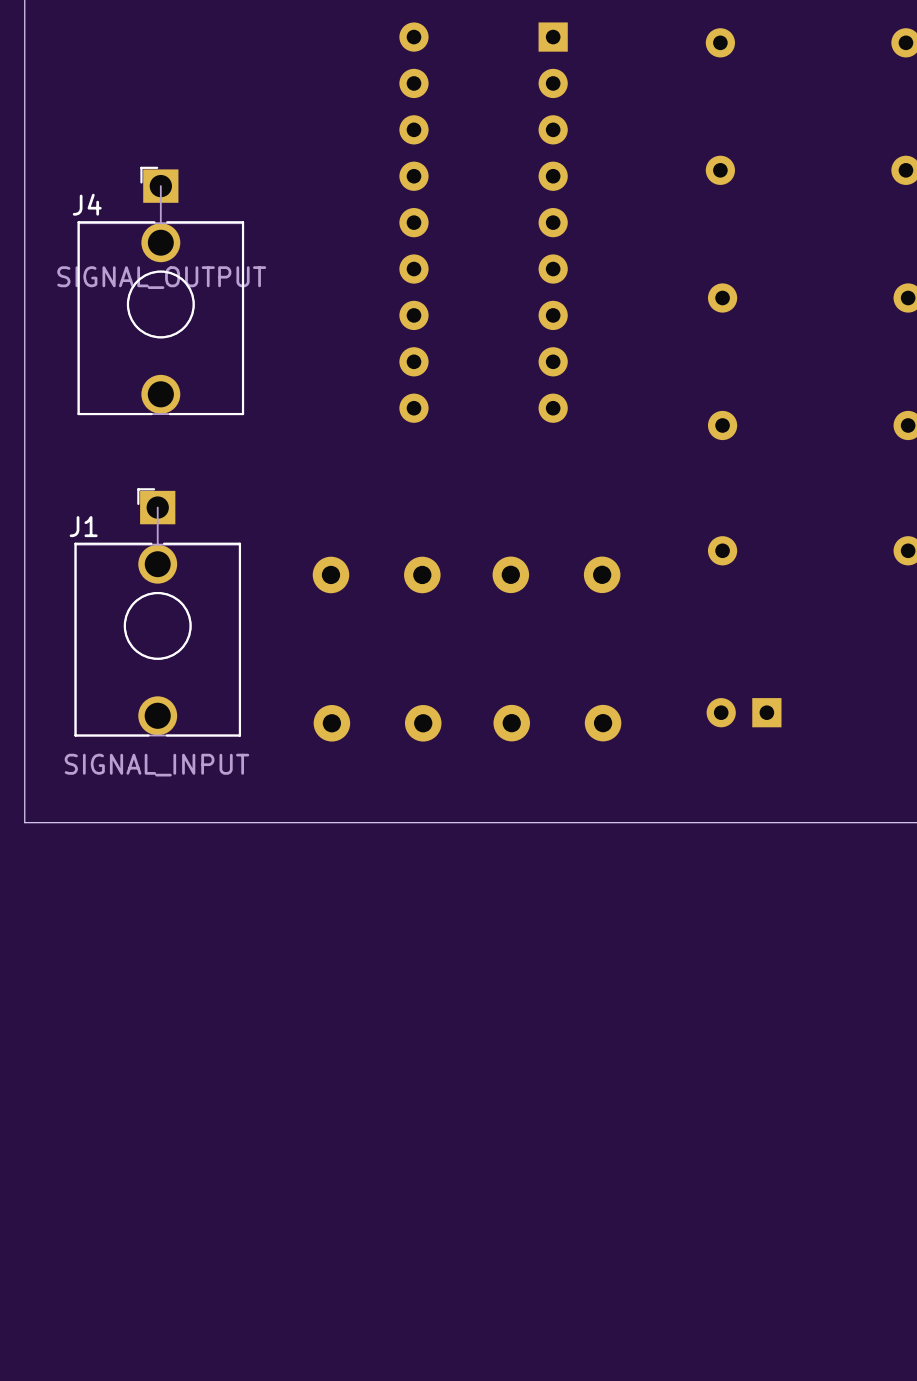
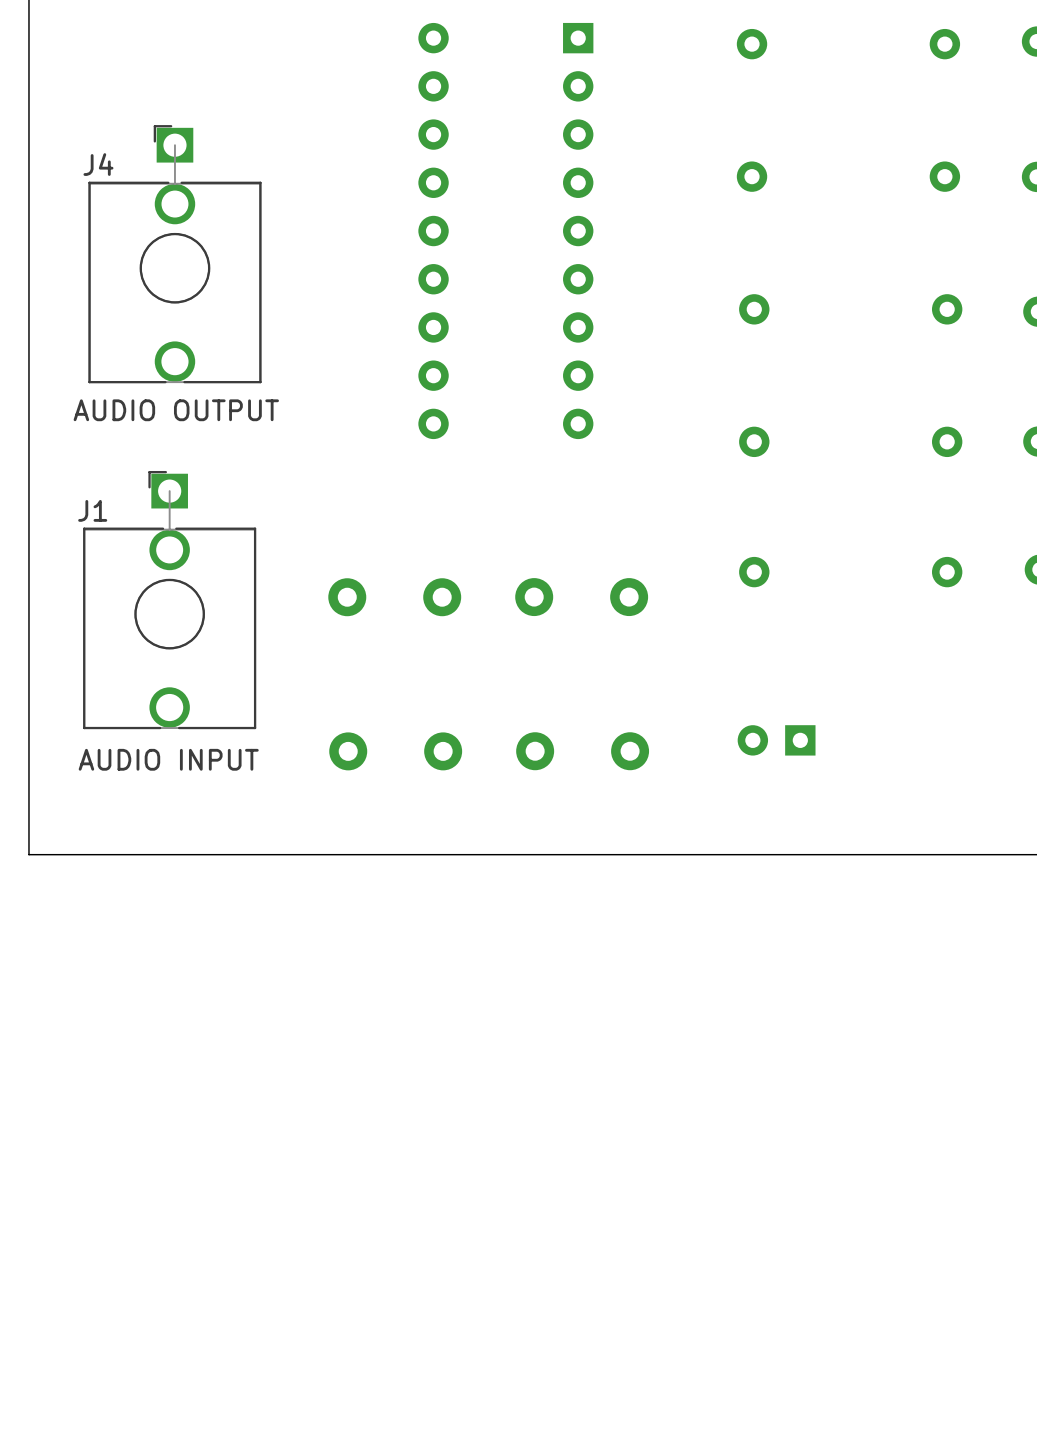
J4 value: SIGNAL_OUTPUT (161, 277) -> AUDIO OUTPUT (176, 410)
J4 position: (160, 290) -> (174, 254)
J1 position: (157, 612) -> (169, 600)
J1 value: SIGNAL_INPUT (156, 765) -> AUDIO INPUT (168, 759)

